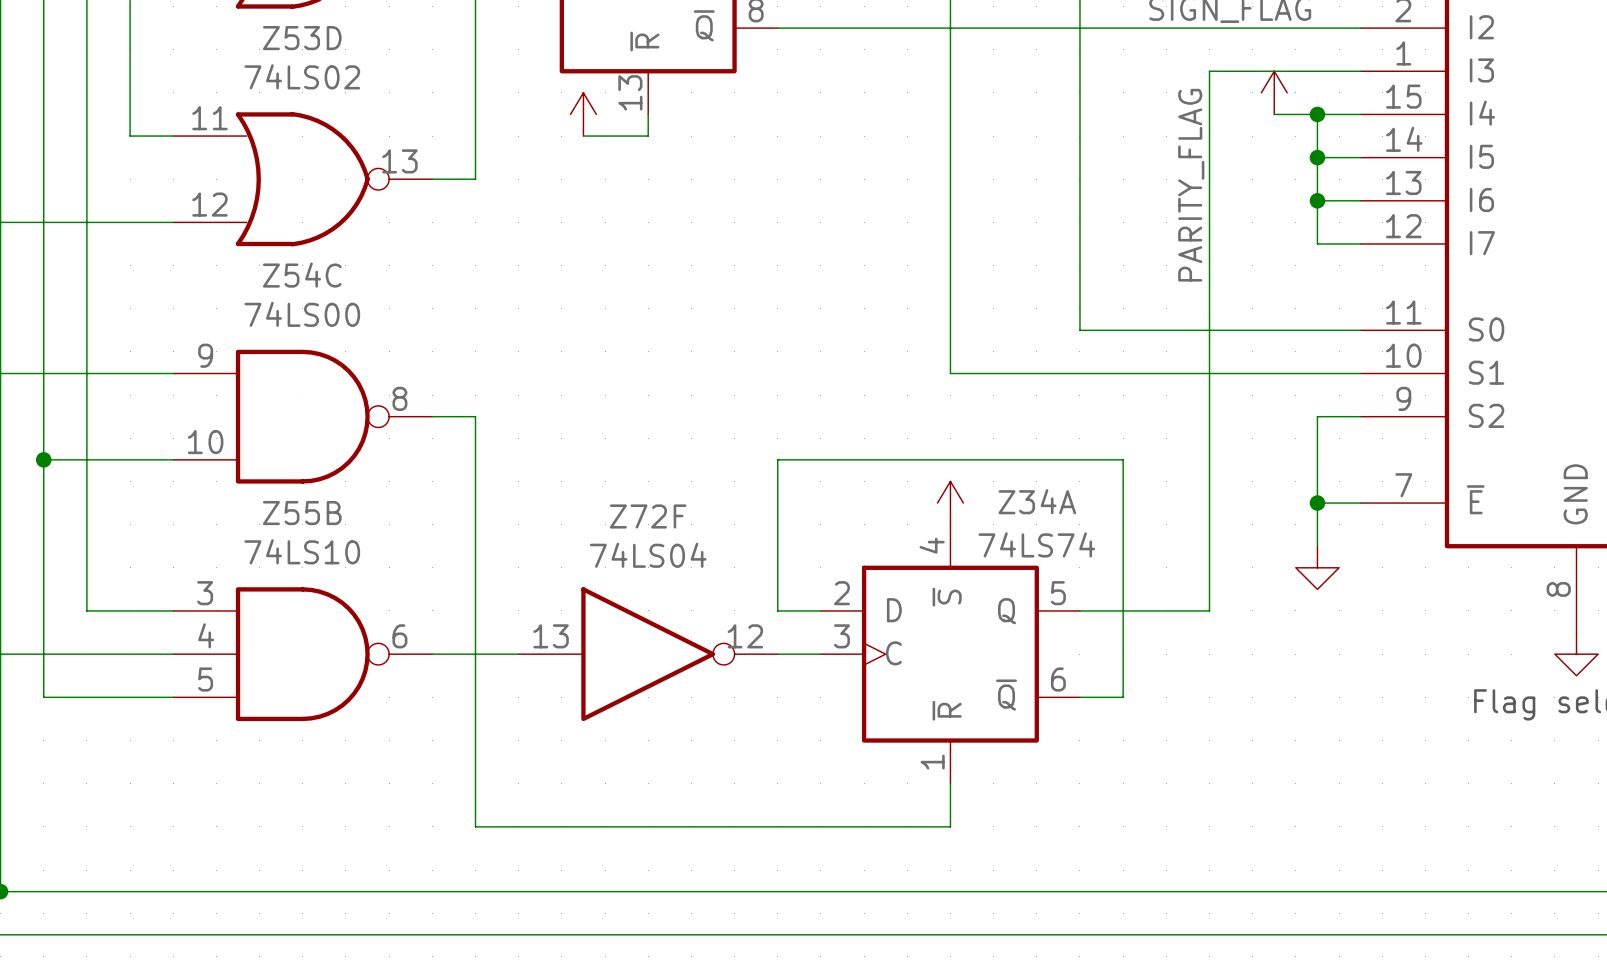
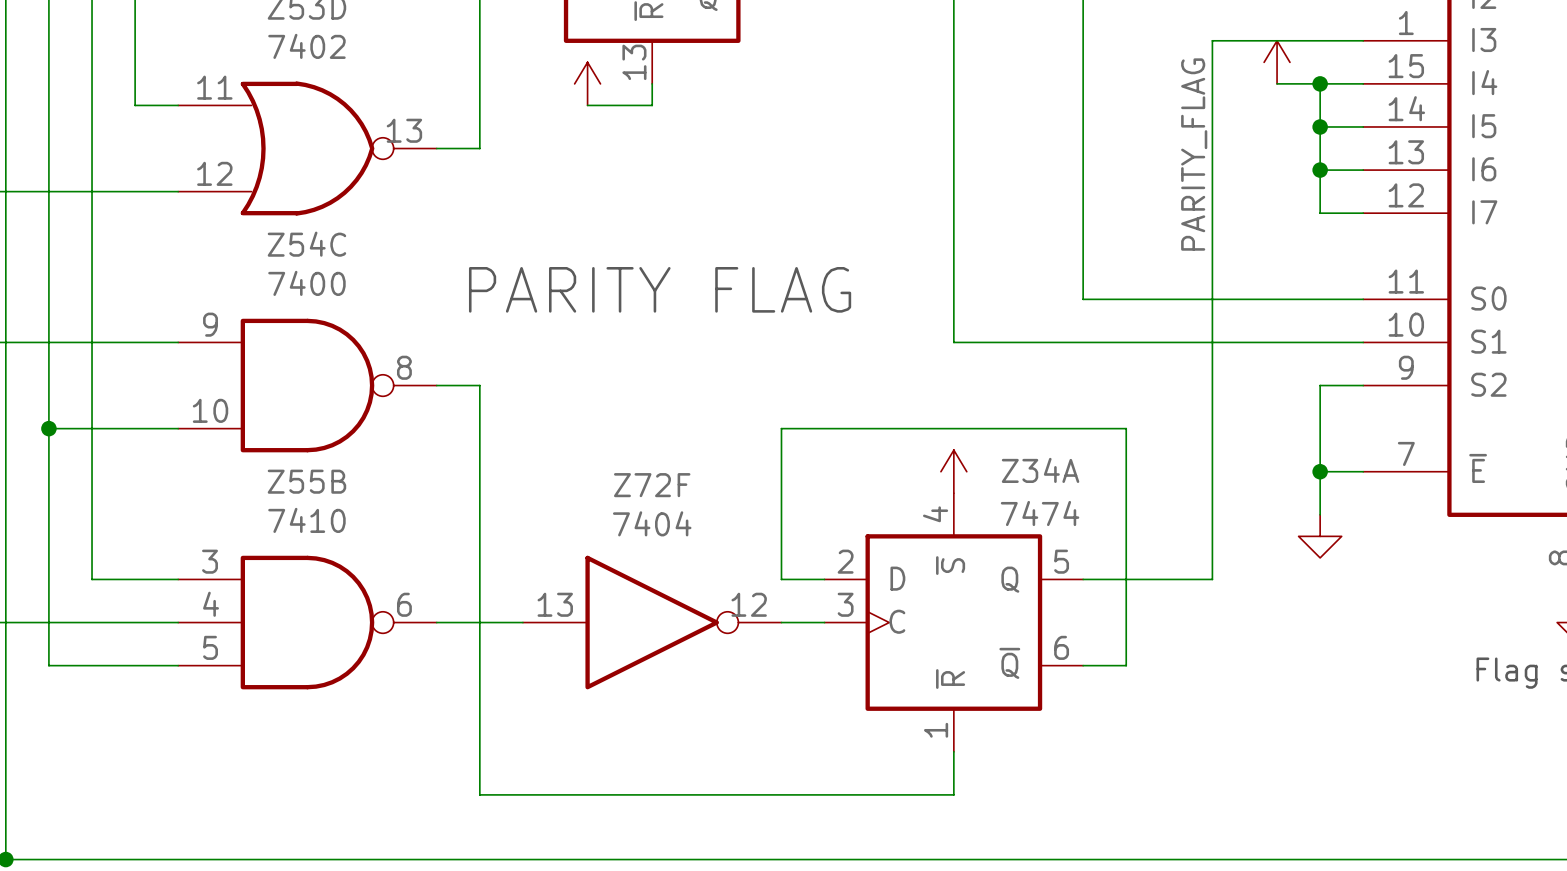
Z53D value: 74LS02 (302, 76) -> 7402 (306, 46)
Z54C value: 74LS00 (302, 314) -> 7400 (306, 283)
text: none -> PARITY FLAG (660, 289)
Z34A value: 74LS74 (1036, 544) -> 7474 (1040, 513)
Z55B value: 74LS10 (302, 551) -> 7410 (306, 520)
Z72F value: 74LS04 (648, 555) -> 7404 (652, 523)

